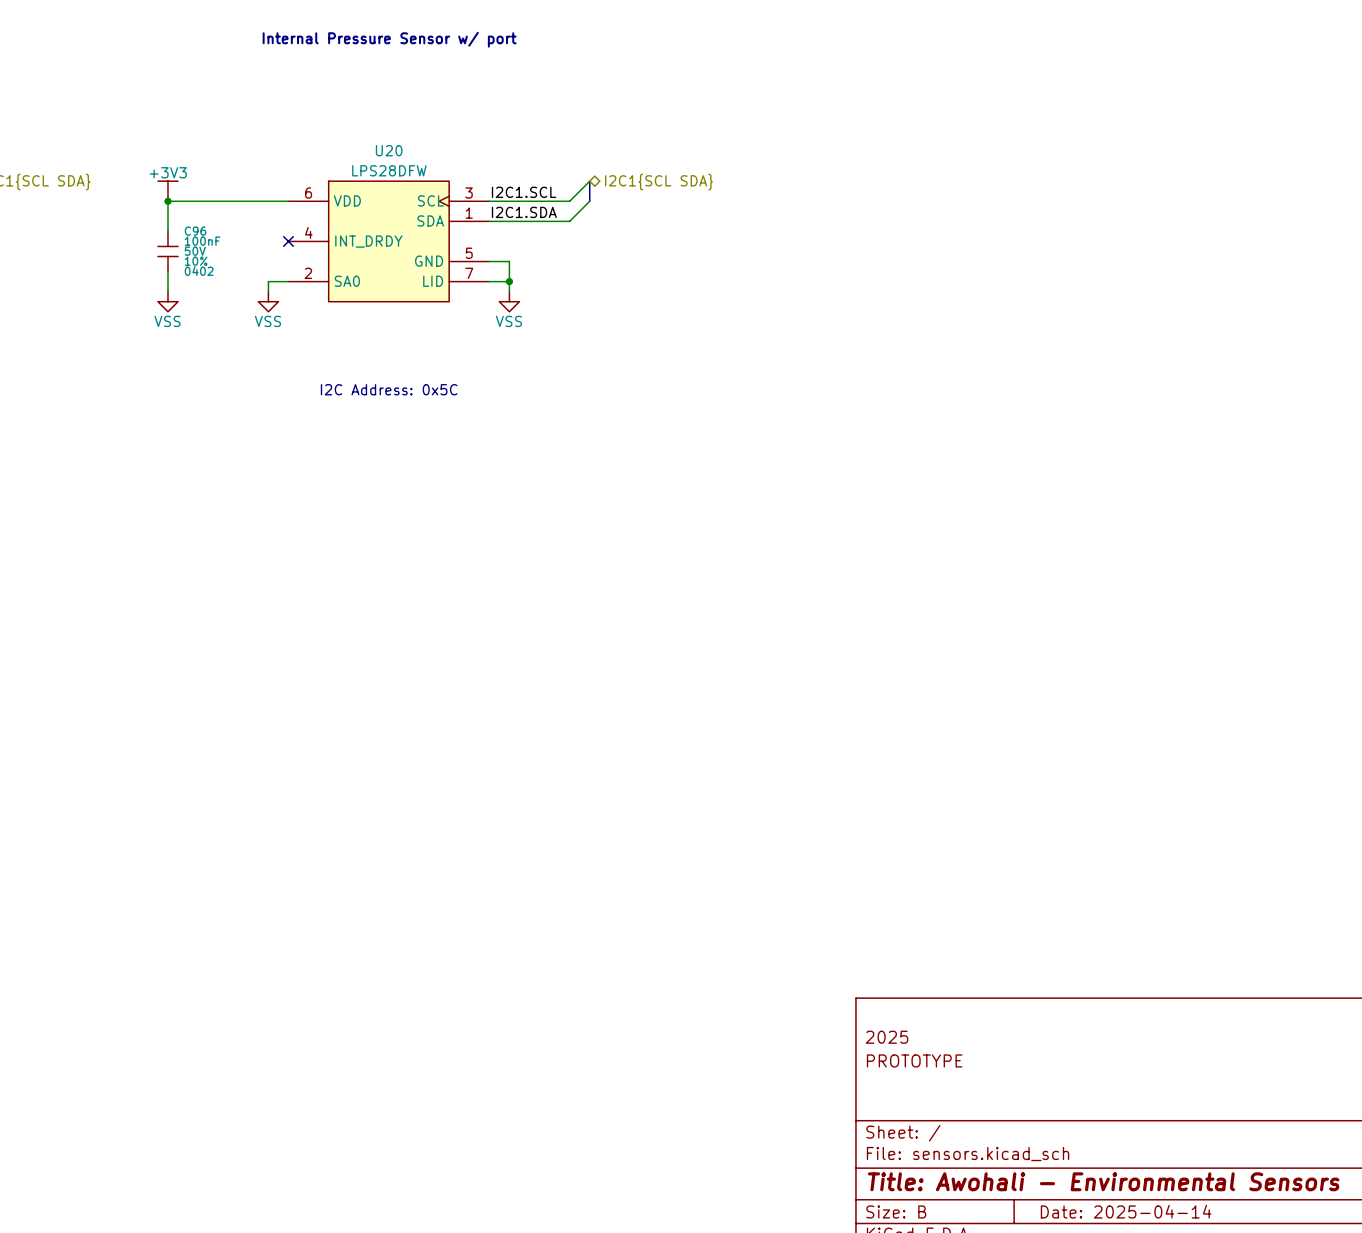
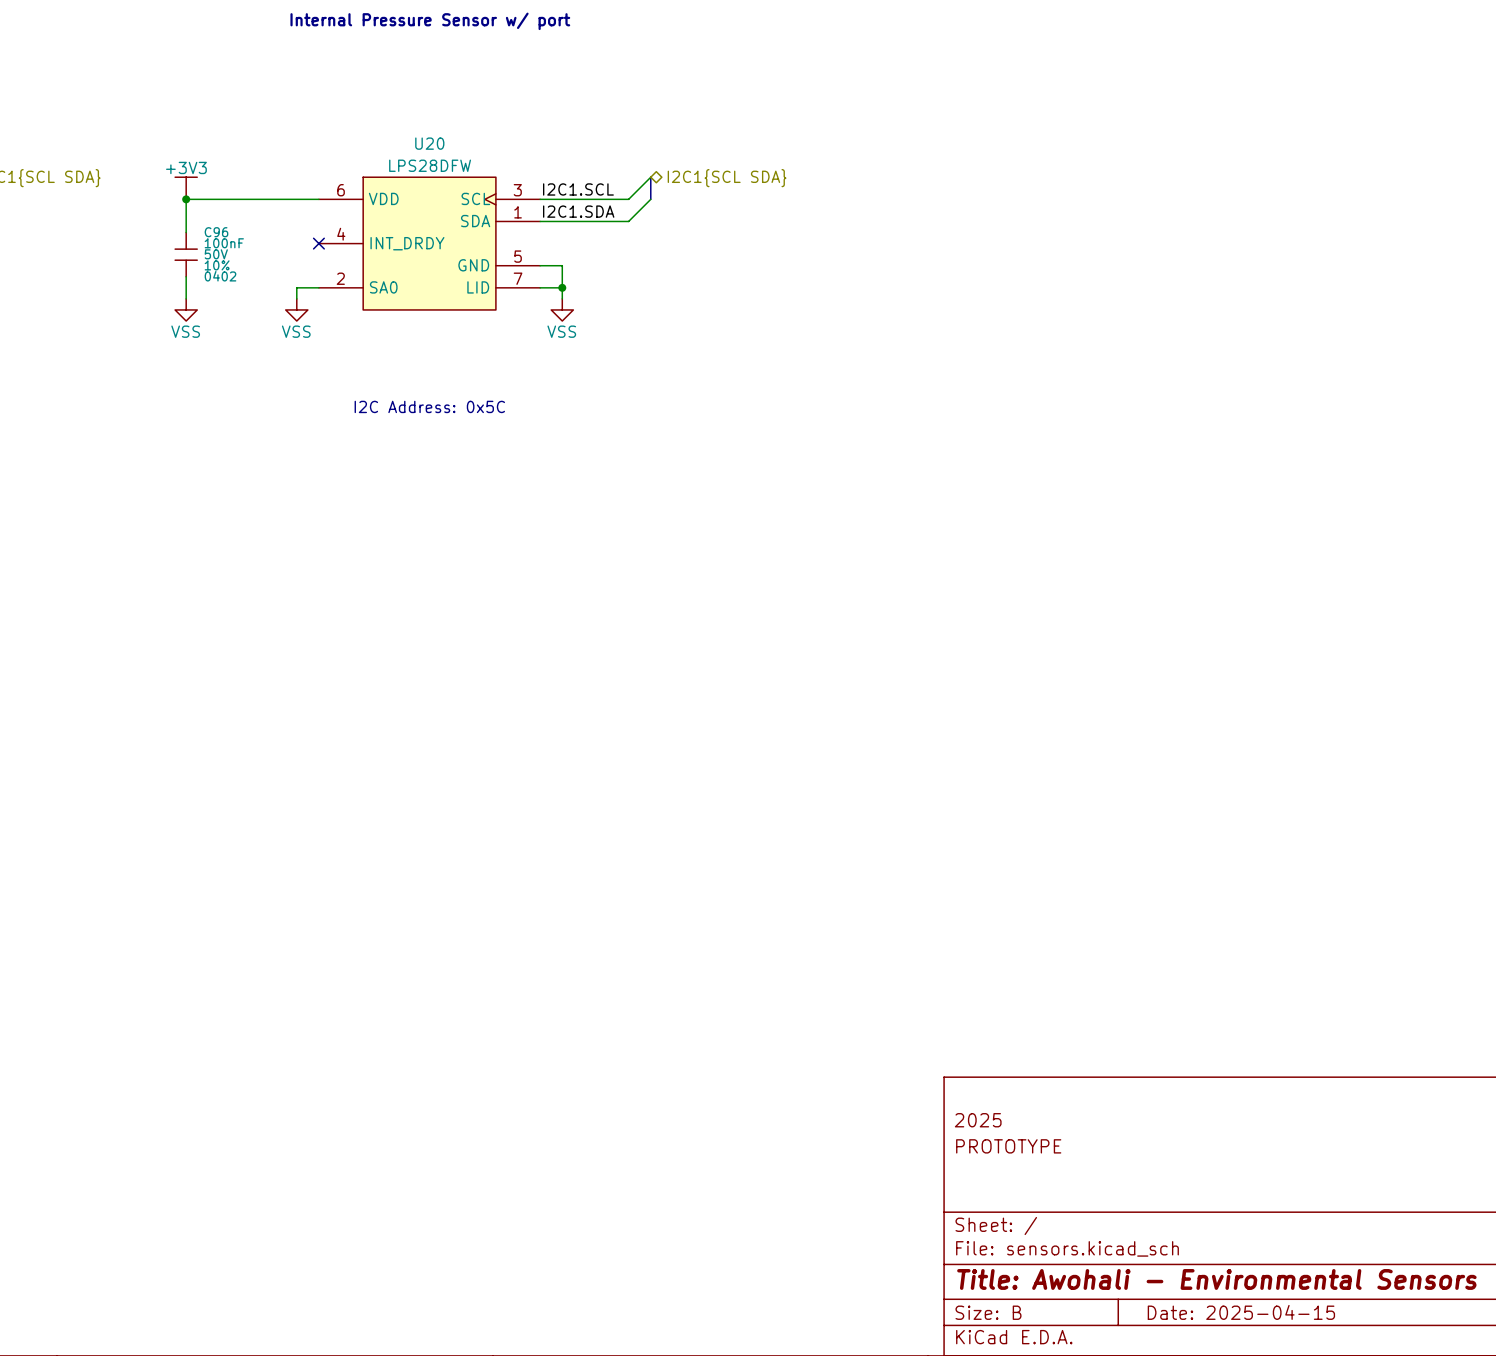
title block: Date: 2025-04-14 (1126, 1211) -> Date: 2025-04-15 (1241, 1312)

